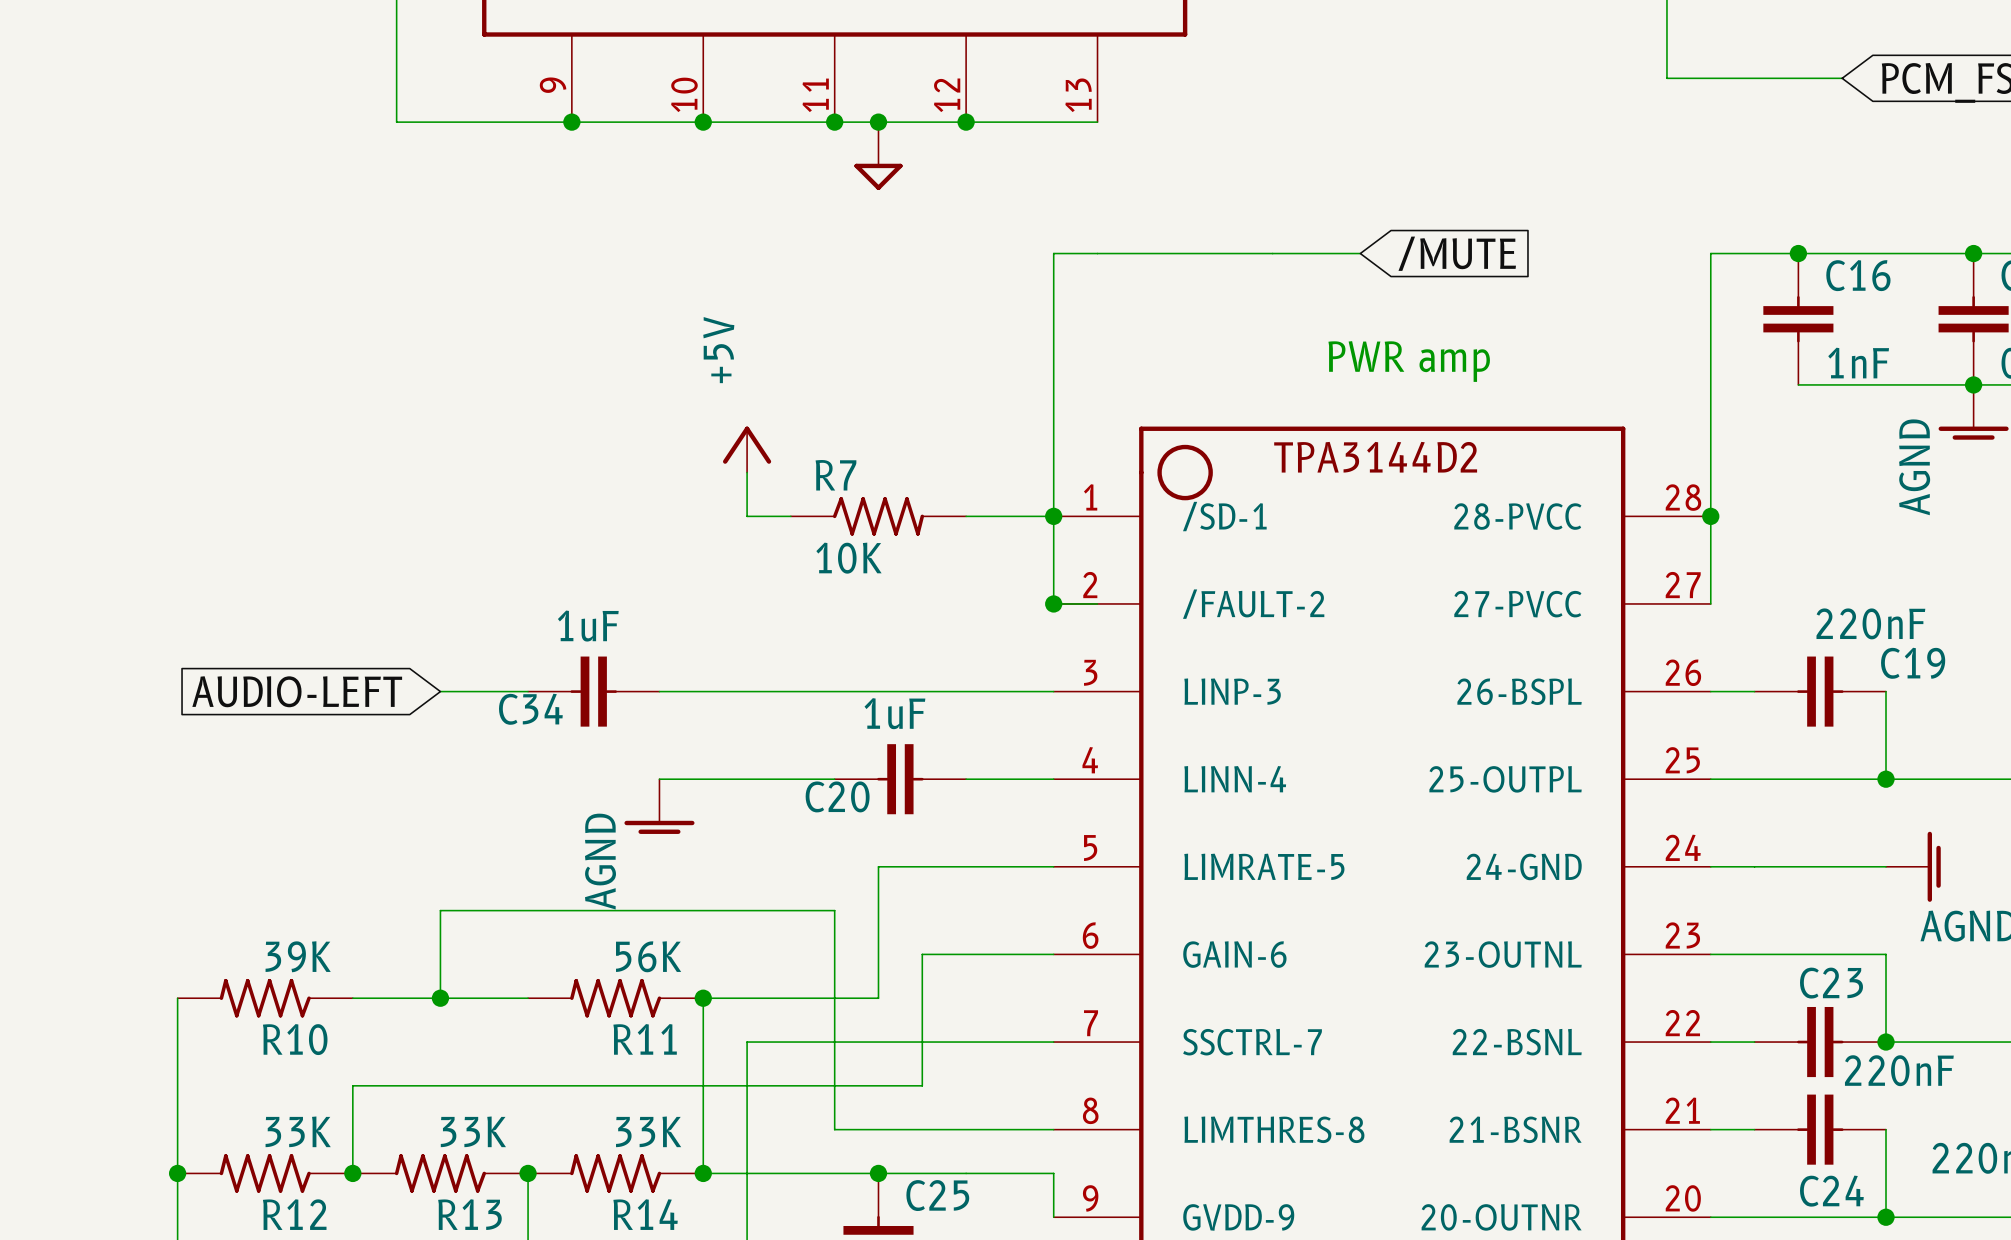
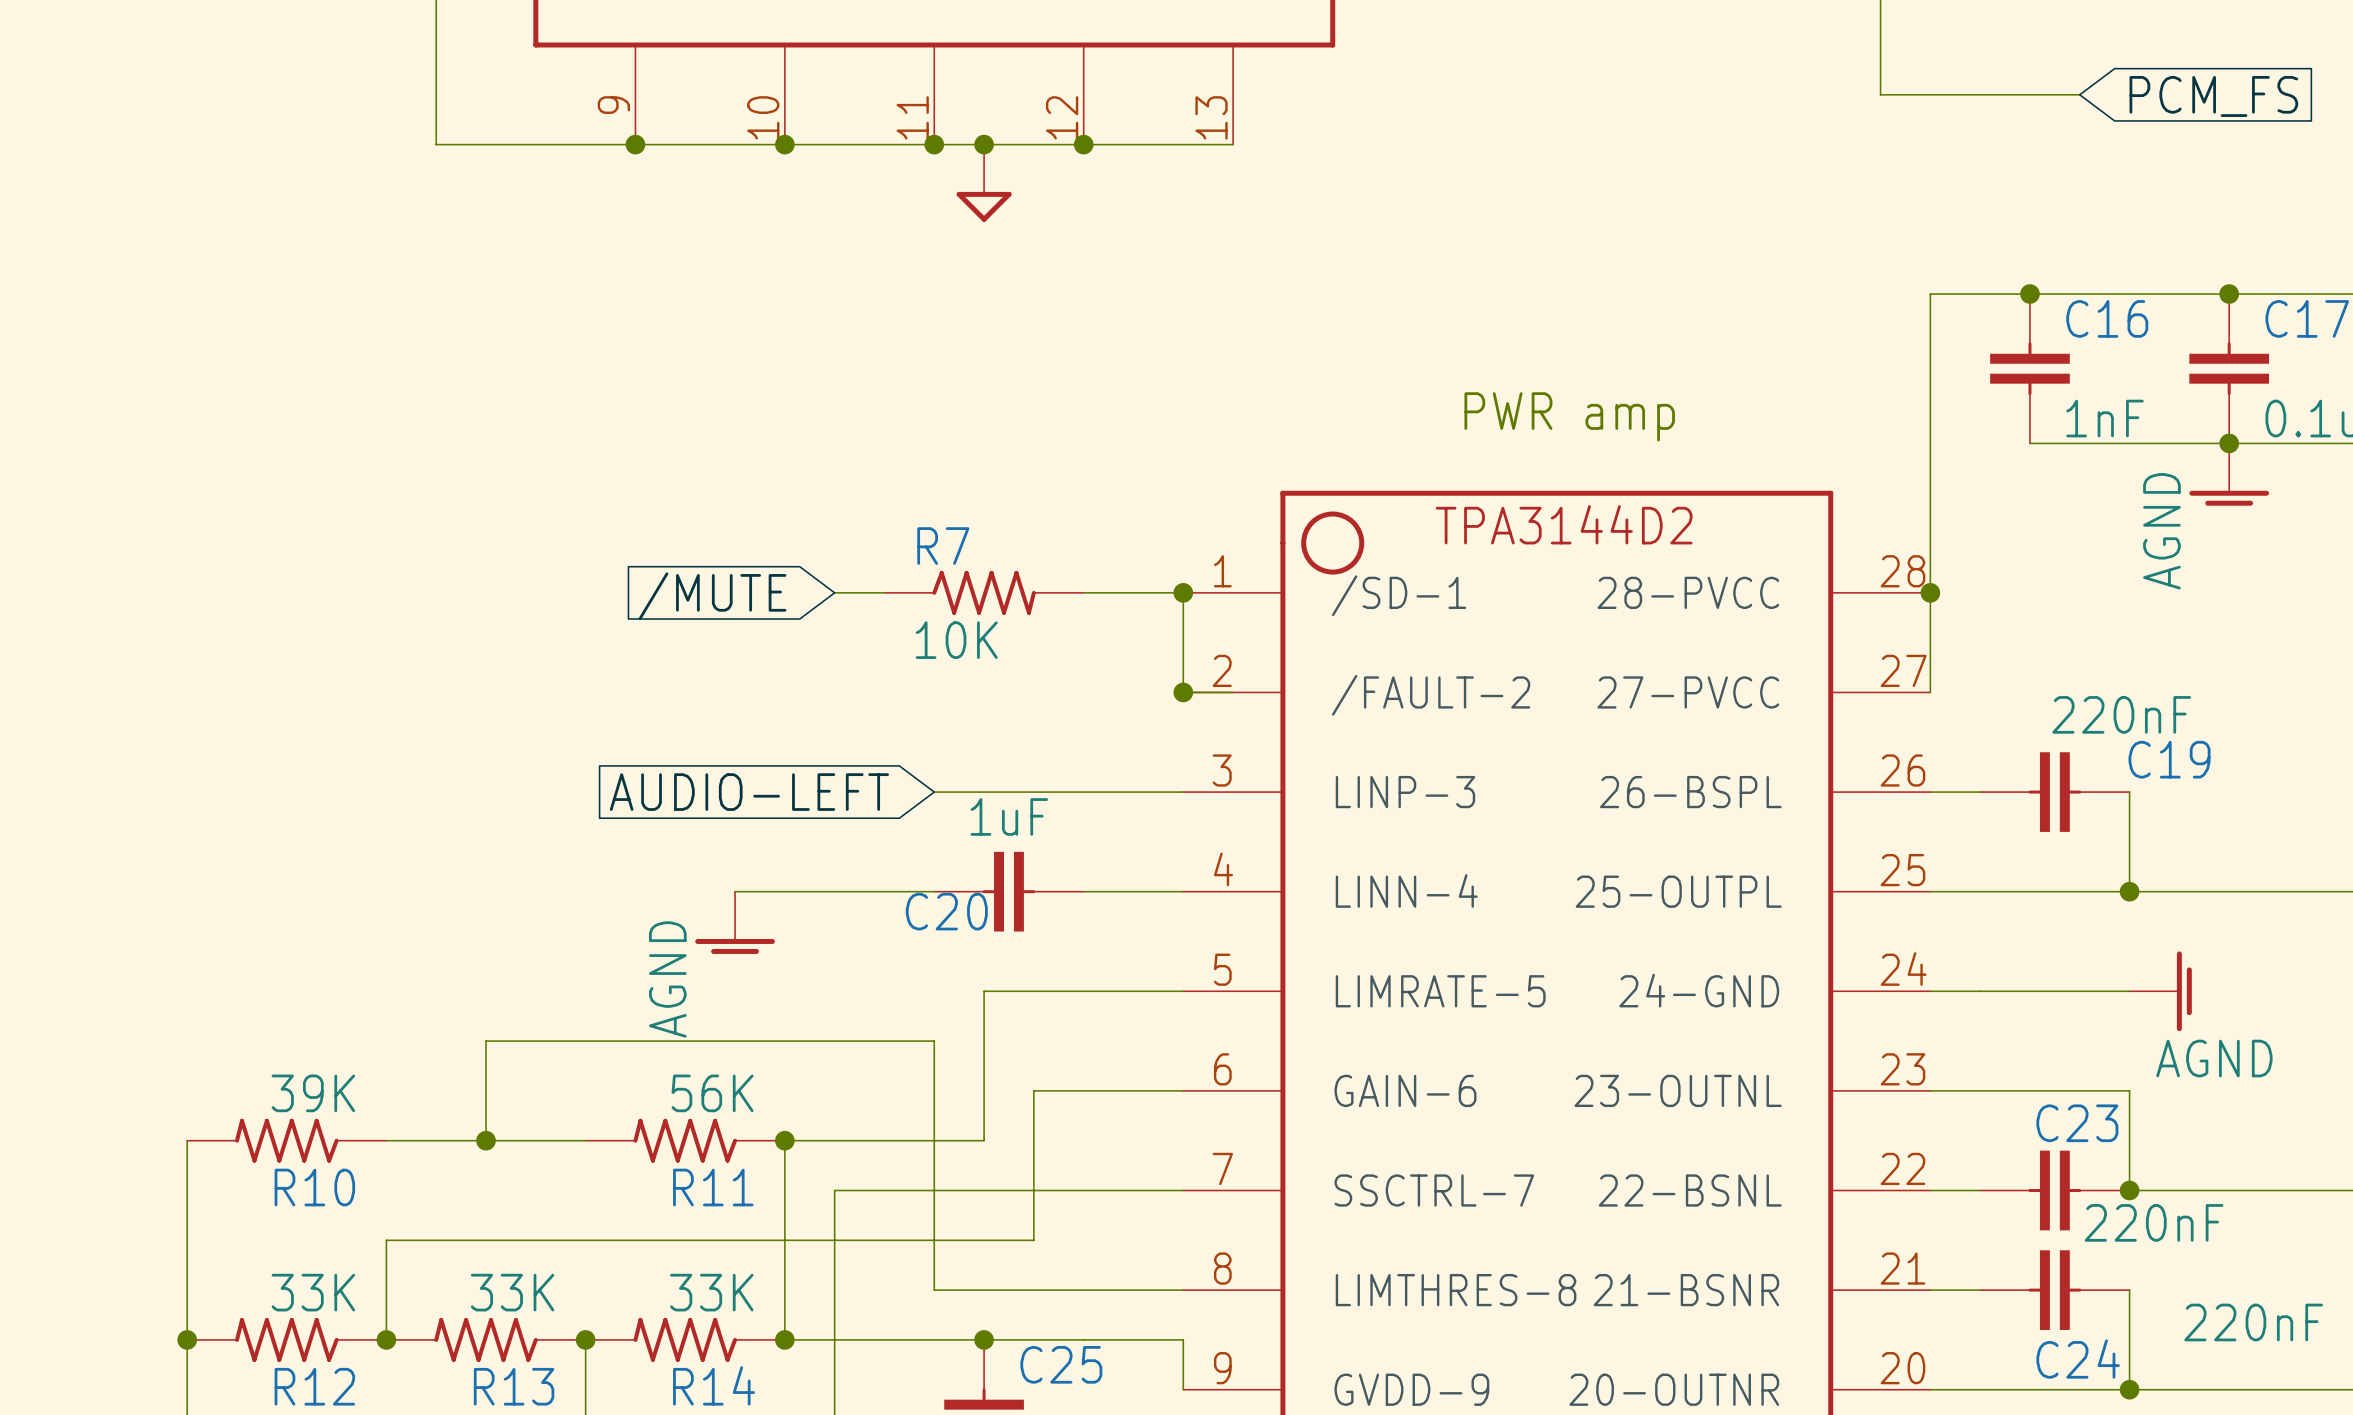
wire: (1360, 253) (1053, 253) (1053, 516) -> none
global label: /MUTE (1457, 253) -> none
power symbol: +5V (747, 449) -> none
wire: (747, 472) (747, 516) -> none
global label: none -> /MUTE (712, 596)
global label position: AUDIO-LEFT (297, 691) -> AUDIO-LEFT (749, 792)
wire: (440, 691) (528, 691) -> none
C34: 1uF (593, 691) -> none
wire: (659, 691) (834, 691) -> none

